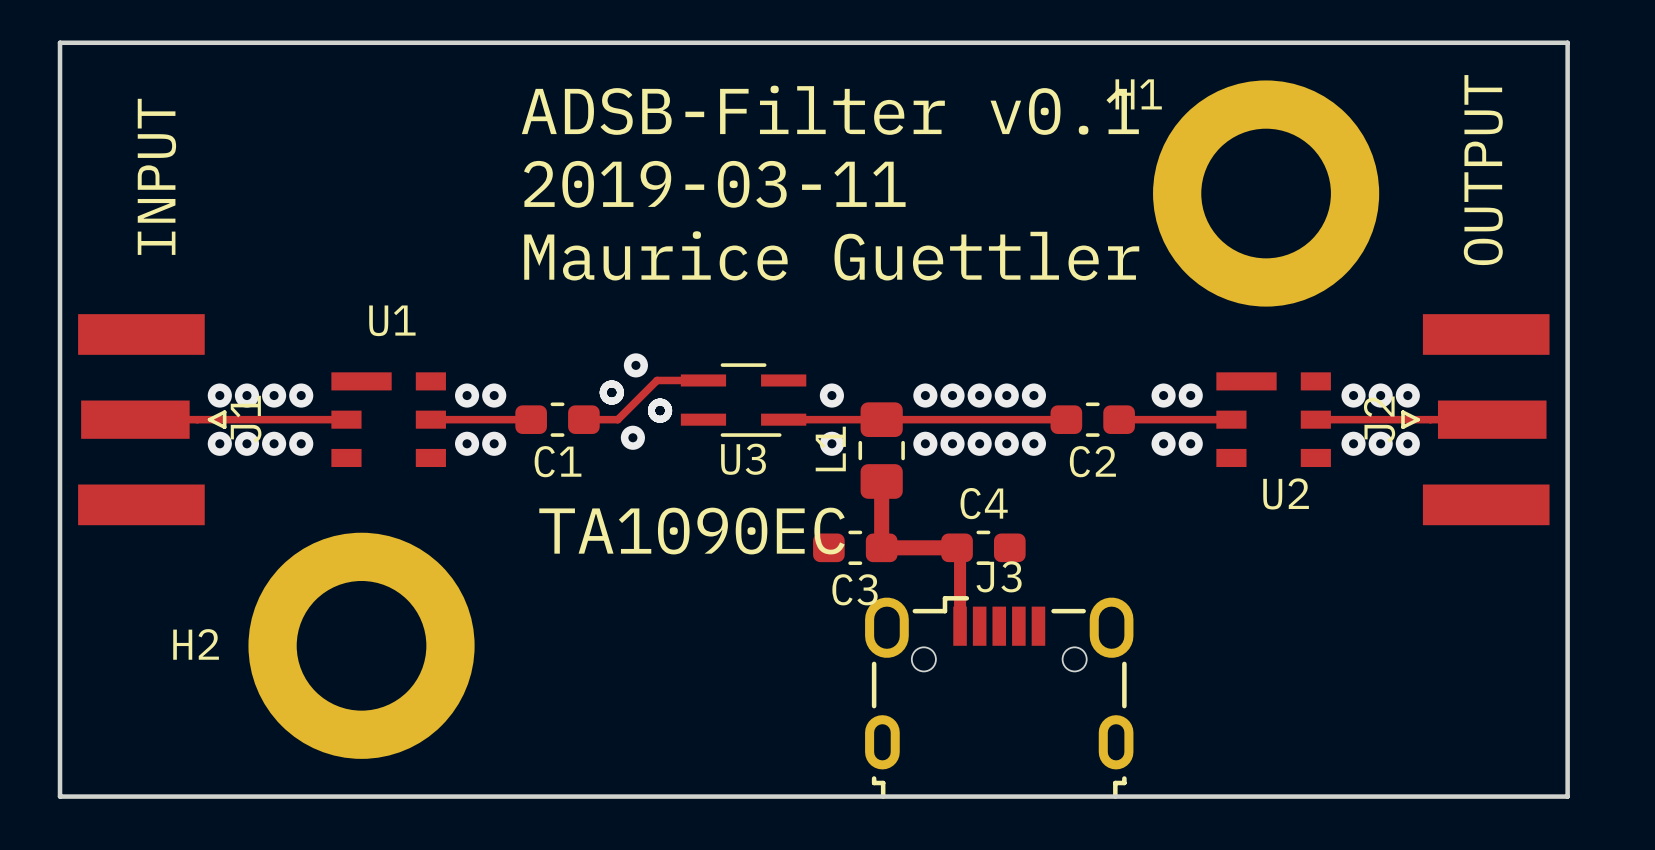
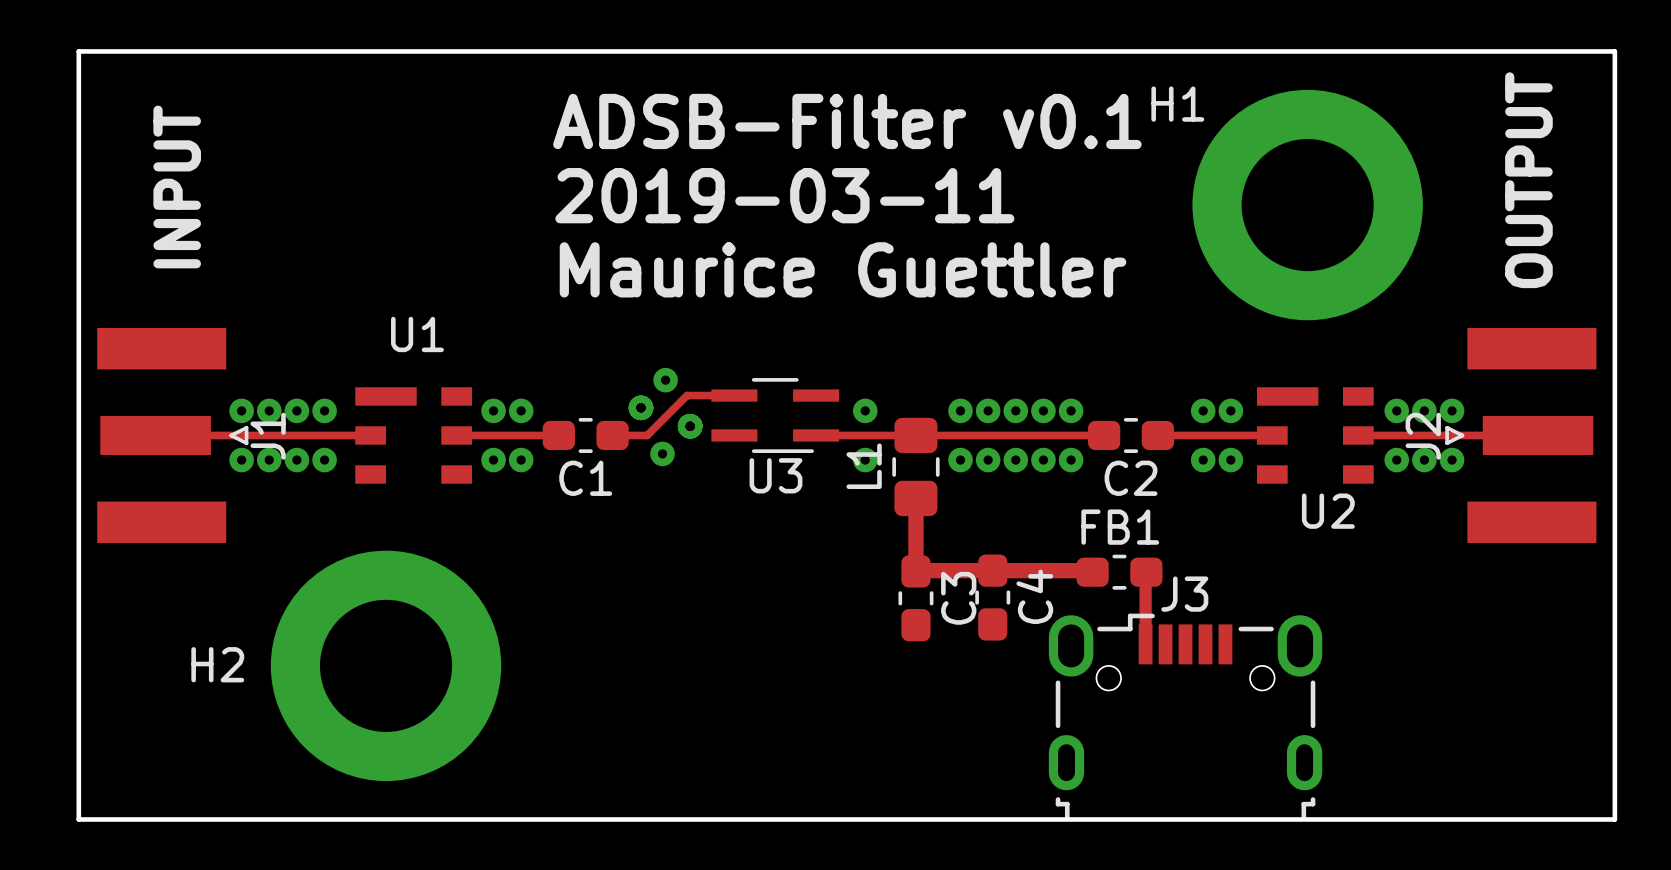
text: TA1090EC (692, 531) -> none
C3 rotation: 0° (855, 547) -> 90° clockwise (915, 598)
track: (881, 547) (957, 547) (960, 550) (960, 626) -> (915, 566) (915, 571) (1091, 570) (1092, 572)
C4 rotation: 0° (983, 547) -> 90° clockwise (992, 597)
FB1: none -> (1119, 572)
track: none -> (1146, 572) (1145, 644)
C3 name position: C3 (855, 589) -> C3 (958, 598)
J3 position: (999, 697) -> (1185, 716)

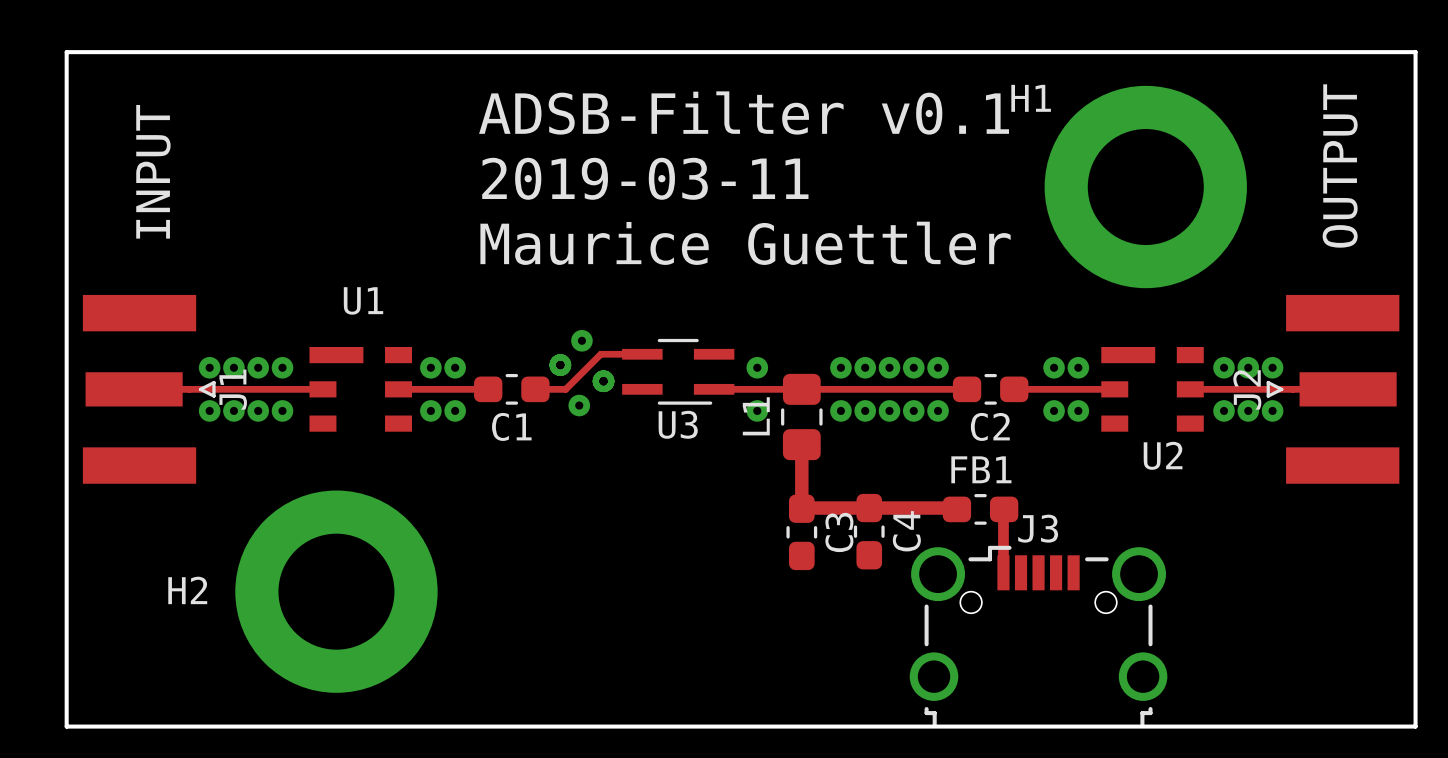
J3 footprint: [1048, 613, 1323, 821] -> [909, 545, 1168, 728]

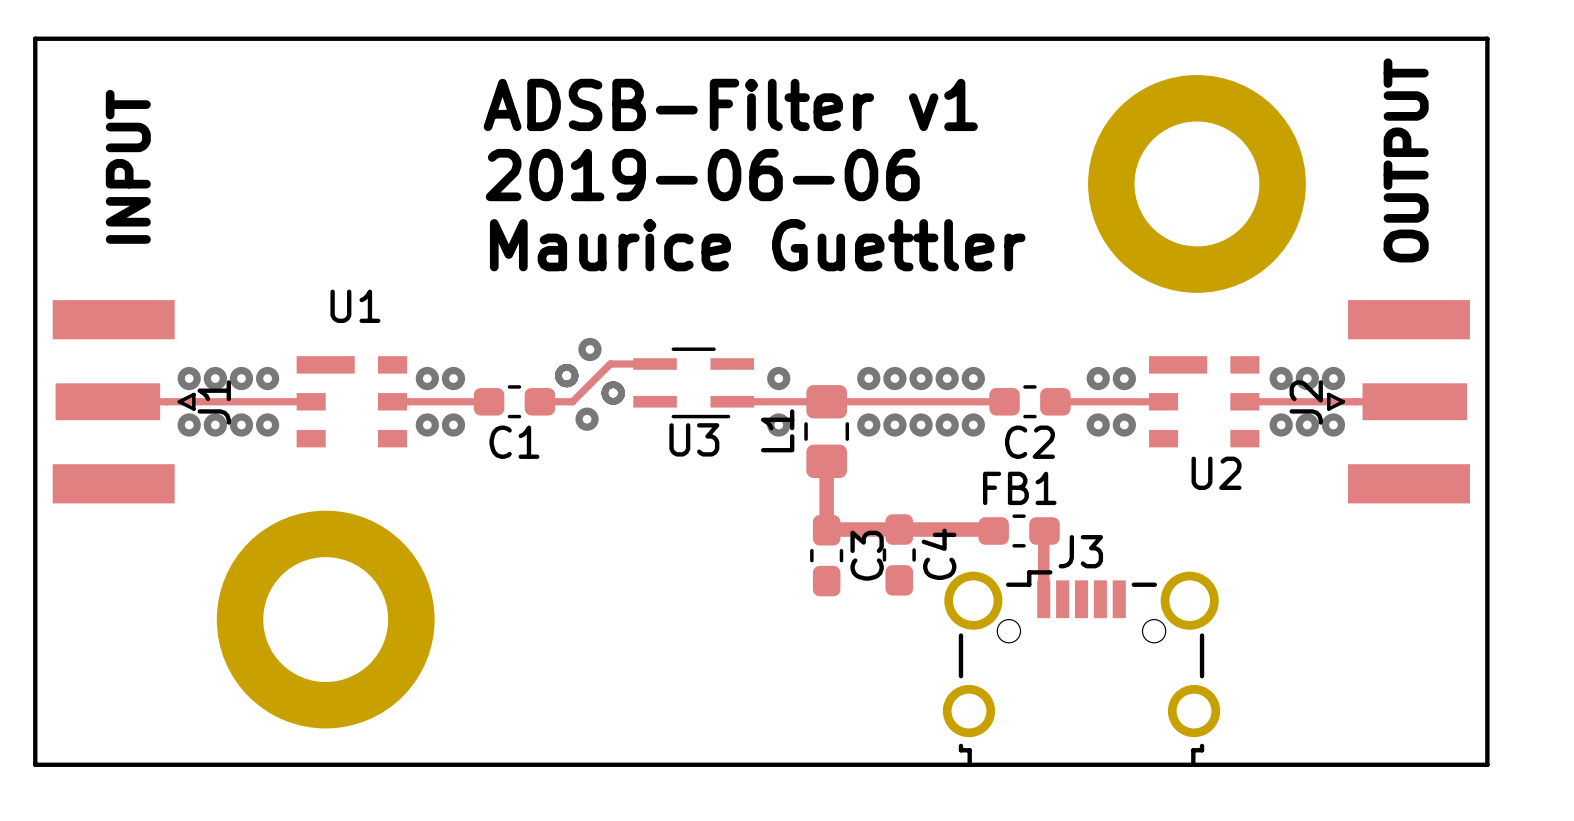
H1 name: H1 (1031, 98) -> none
text: ADSB-Filter v0.1 (744, 113) -> ADSB-Filter v1 (730, 104)
text: 2019-03-11 (645, 178) -> 2019-06-06 (702, 175)
H2 name: H2 (187, 590) -> none

